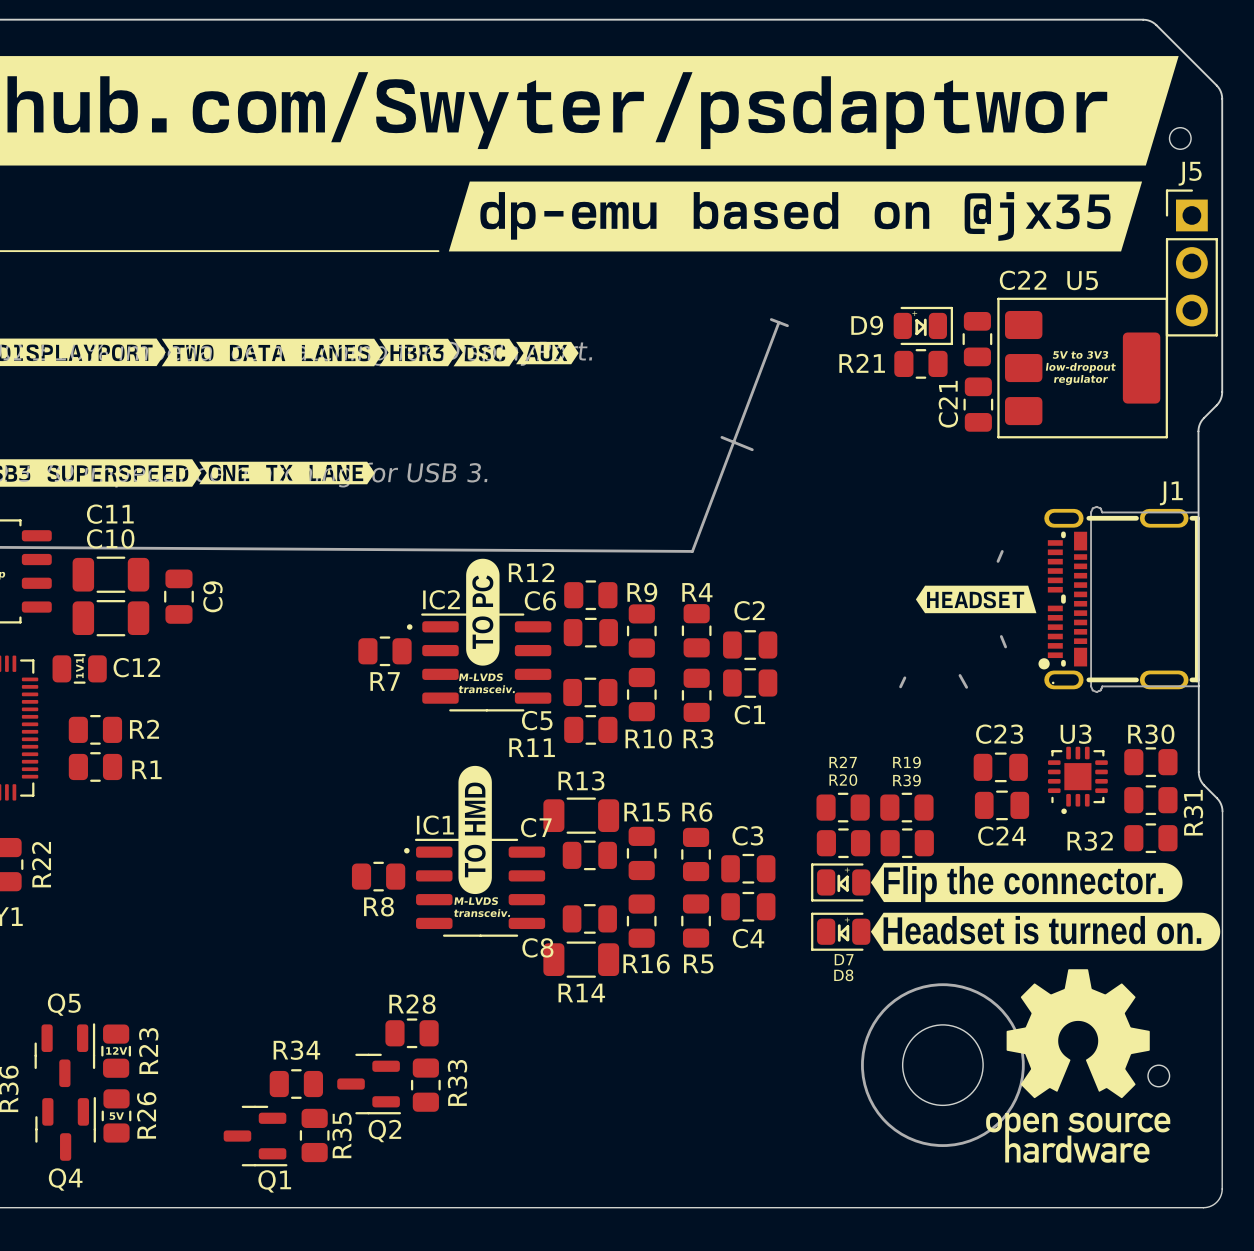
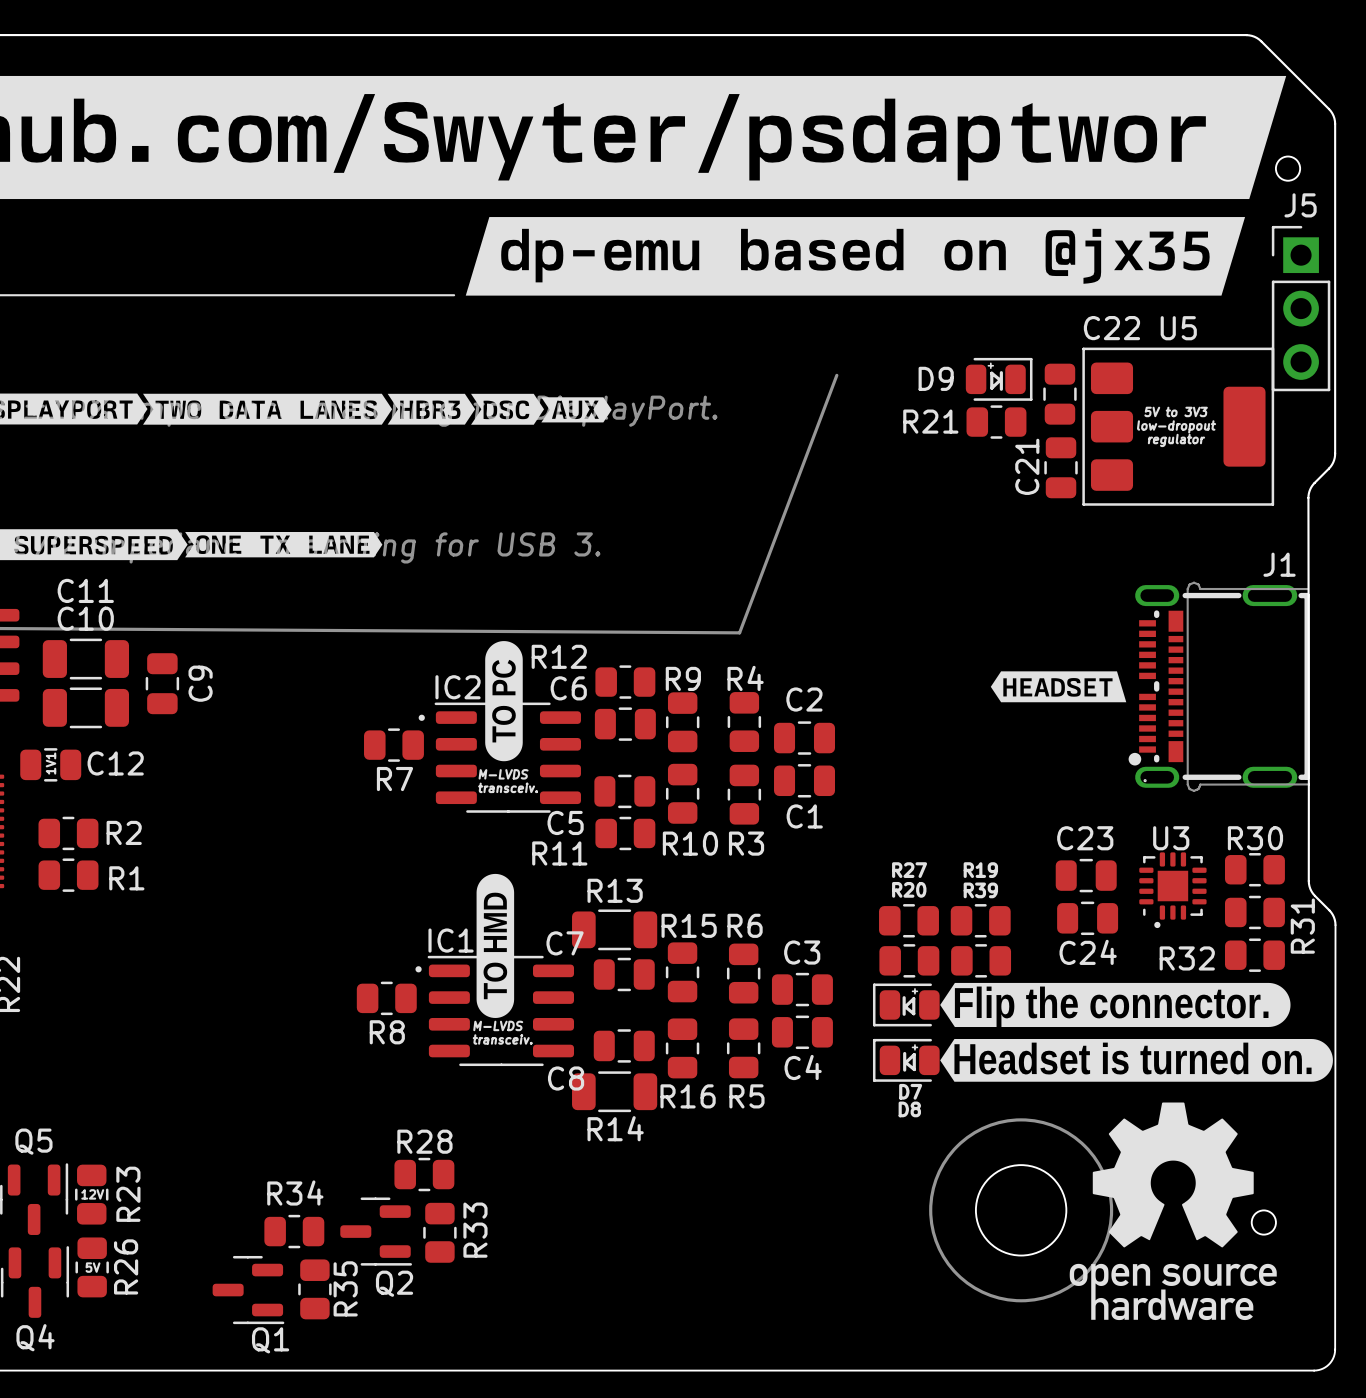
line: (771, 319) (787, 325) -> none
line: (721, 437) (752, 449) -> none
line: (1002, 551) (998, 561) -> none
line: (1001, 636) (1005, 646) -> none
line: (959, 675) (966, 687) -> none
line: (904, 677) (900, 686) -> none

